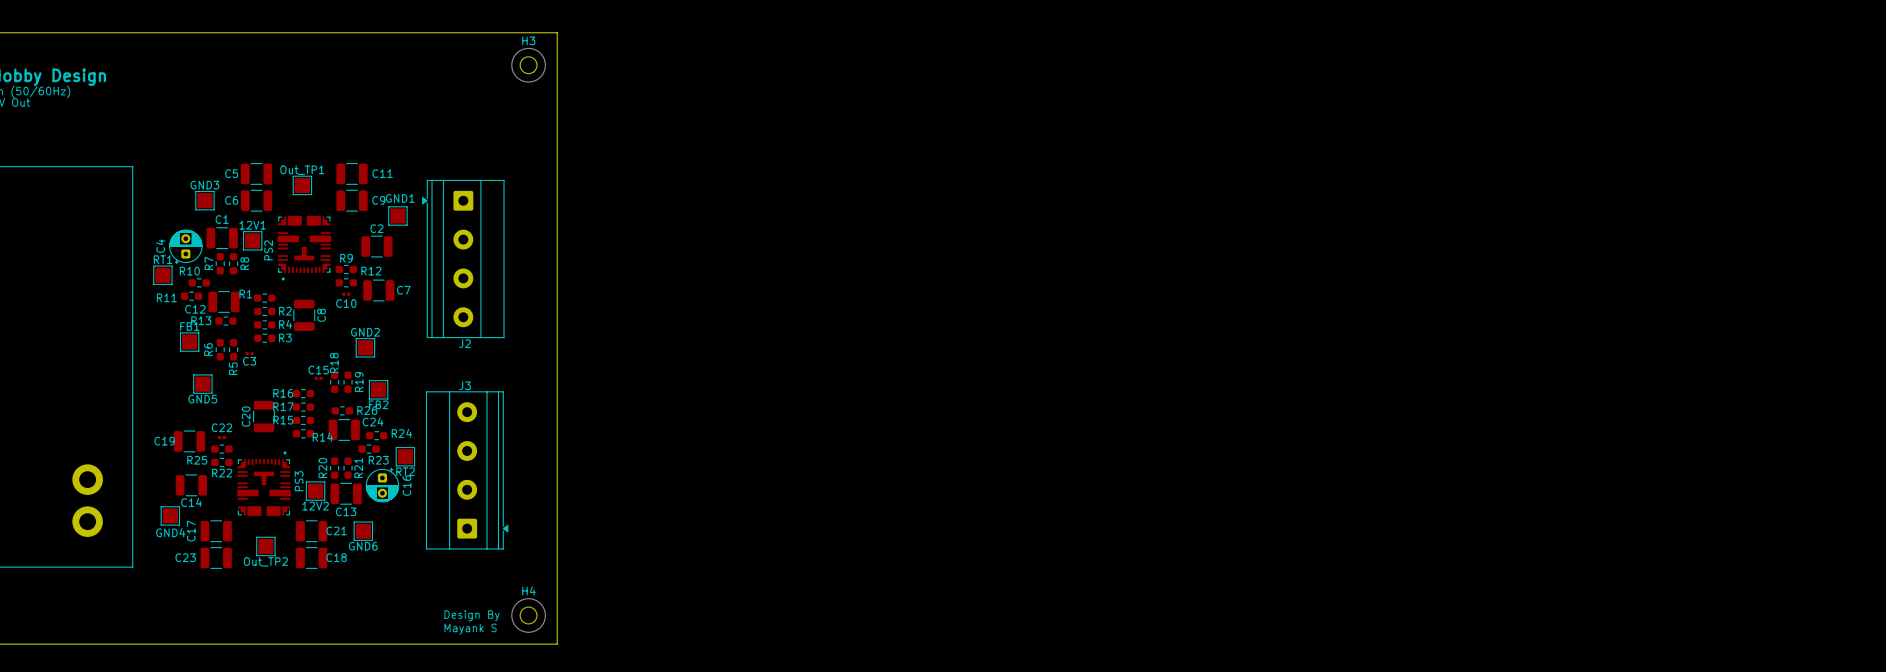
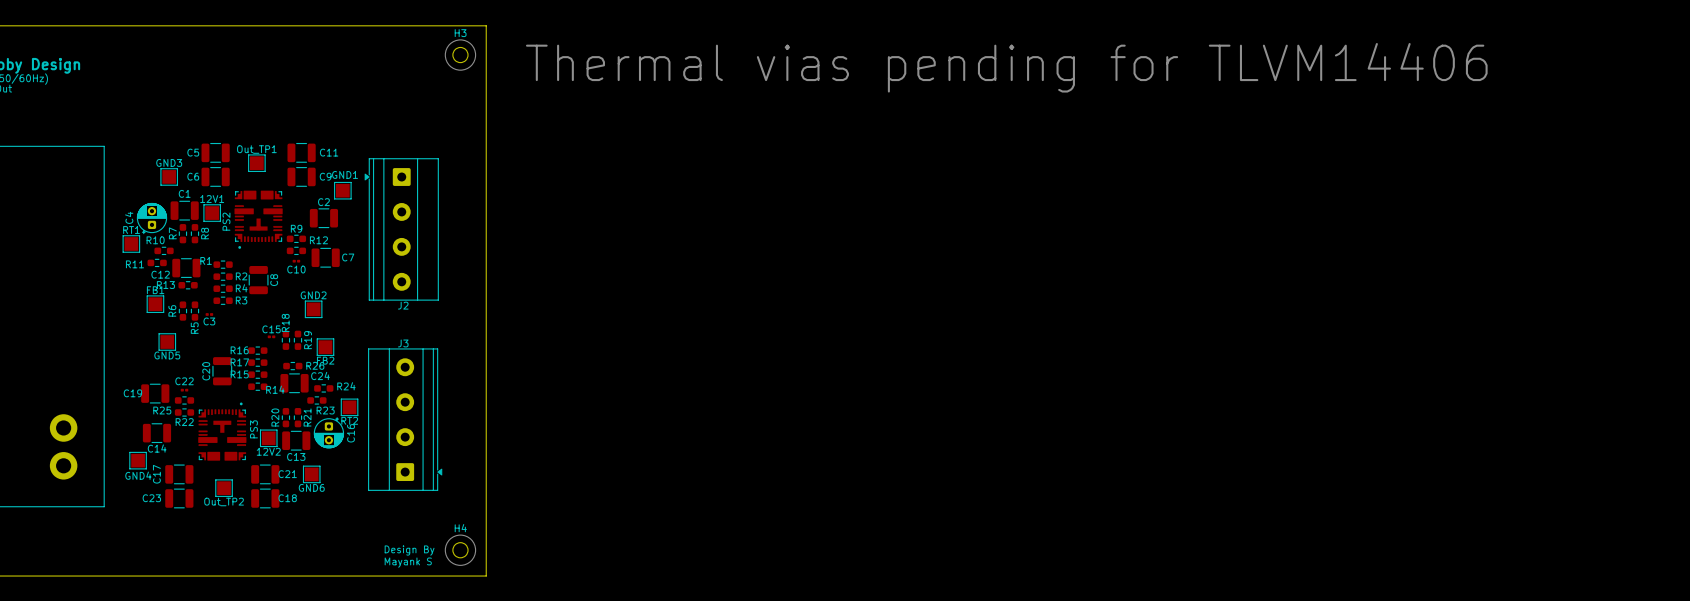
text: none -> Thermal vias pending for TLVM14406 (1006, 67)

